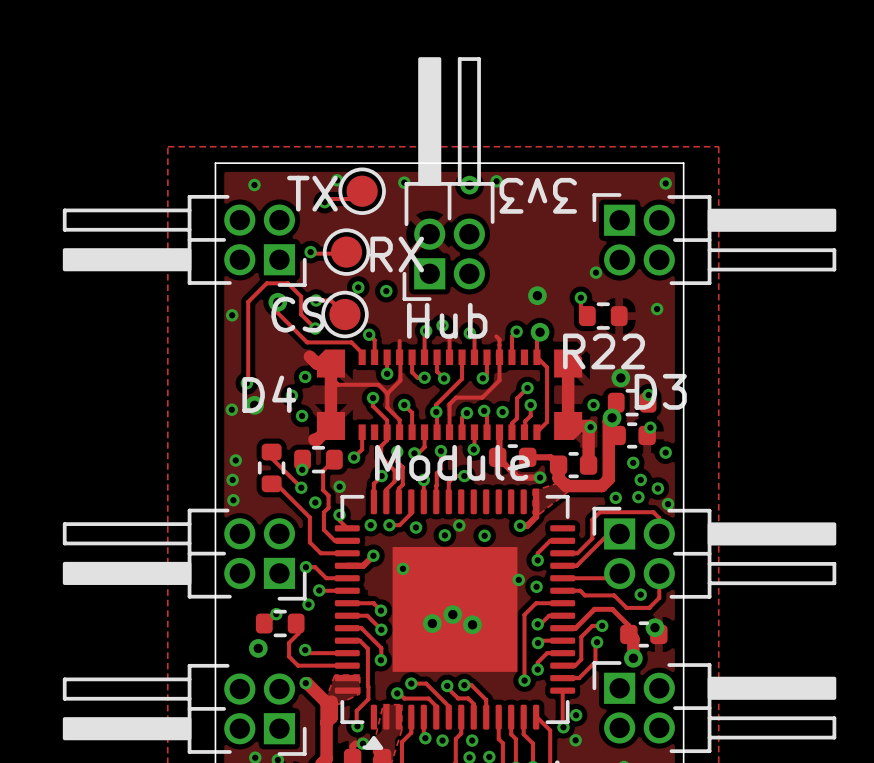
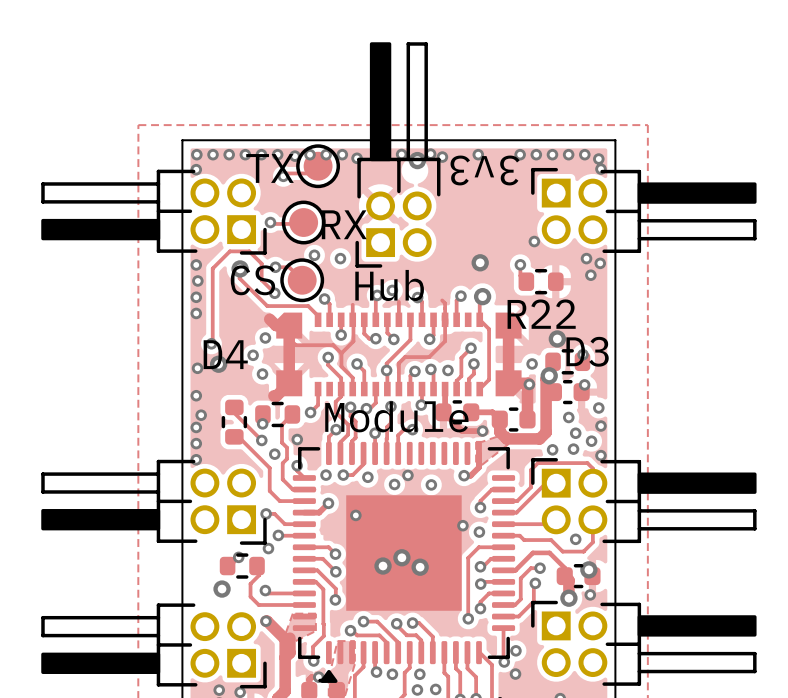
via: none -> (196, 154)
via: none -> (213, 154)
via: none -> (229, 154)
via: none -> (245, 154)
via: none -> (261, 154)
via: none -> (277, 154)
via: none -> (309, 154)
via: none -> (326, 154)
via: none -> (342, 154)
via: none -> (401, 154)
via: none -> (430, 154)
via: none -> (478, 154)
via: none -> (520, 154)
via: none -> (536, 154)
via: none -> (552, 154)
via: none -> (568, 154)
via: none -> (584, 154)
via: (254, 184) -> none
via: none -> (196, 169)
via: none -> (600, 169)
via: none -> (586, 258)
via: none -> (600, 263)
via: none -> (196, 264)
via: none -> (196, 297)
via: none -> (196, 313)
via: none -> (196, 395)
via: none -> (600, 426)
via: none -> (196, 427)
via: (232, 479) -> none
via: none -> (196, 443)
via: (233, 500) -> none
via: none -> (196, 459)
via: none -> (590, 594)

